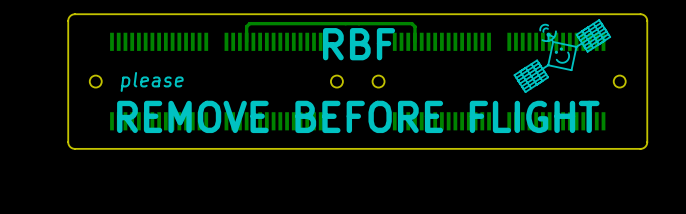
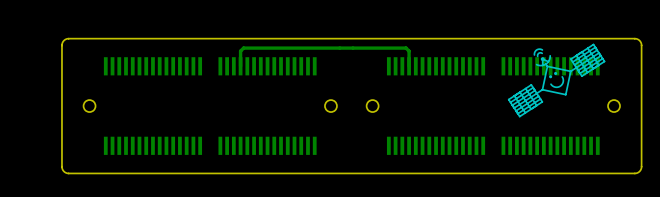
text: RBF (359, 44) -> none
text: please (152, 81) -> none
text: REMOVE BEFORE FLIGHT (358, 116) -> none

